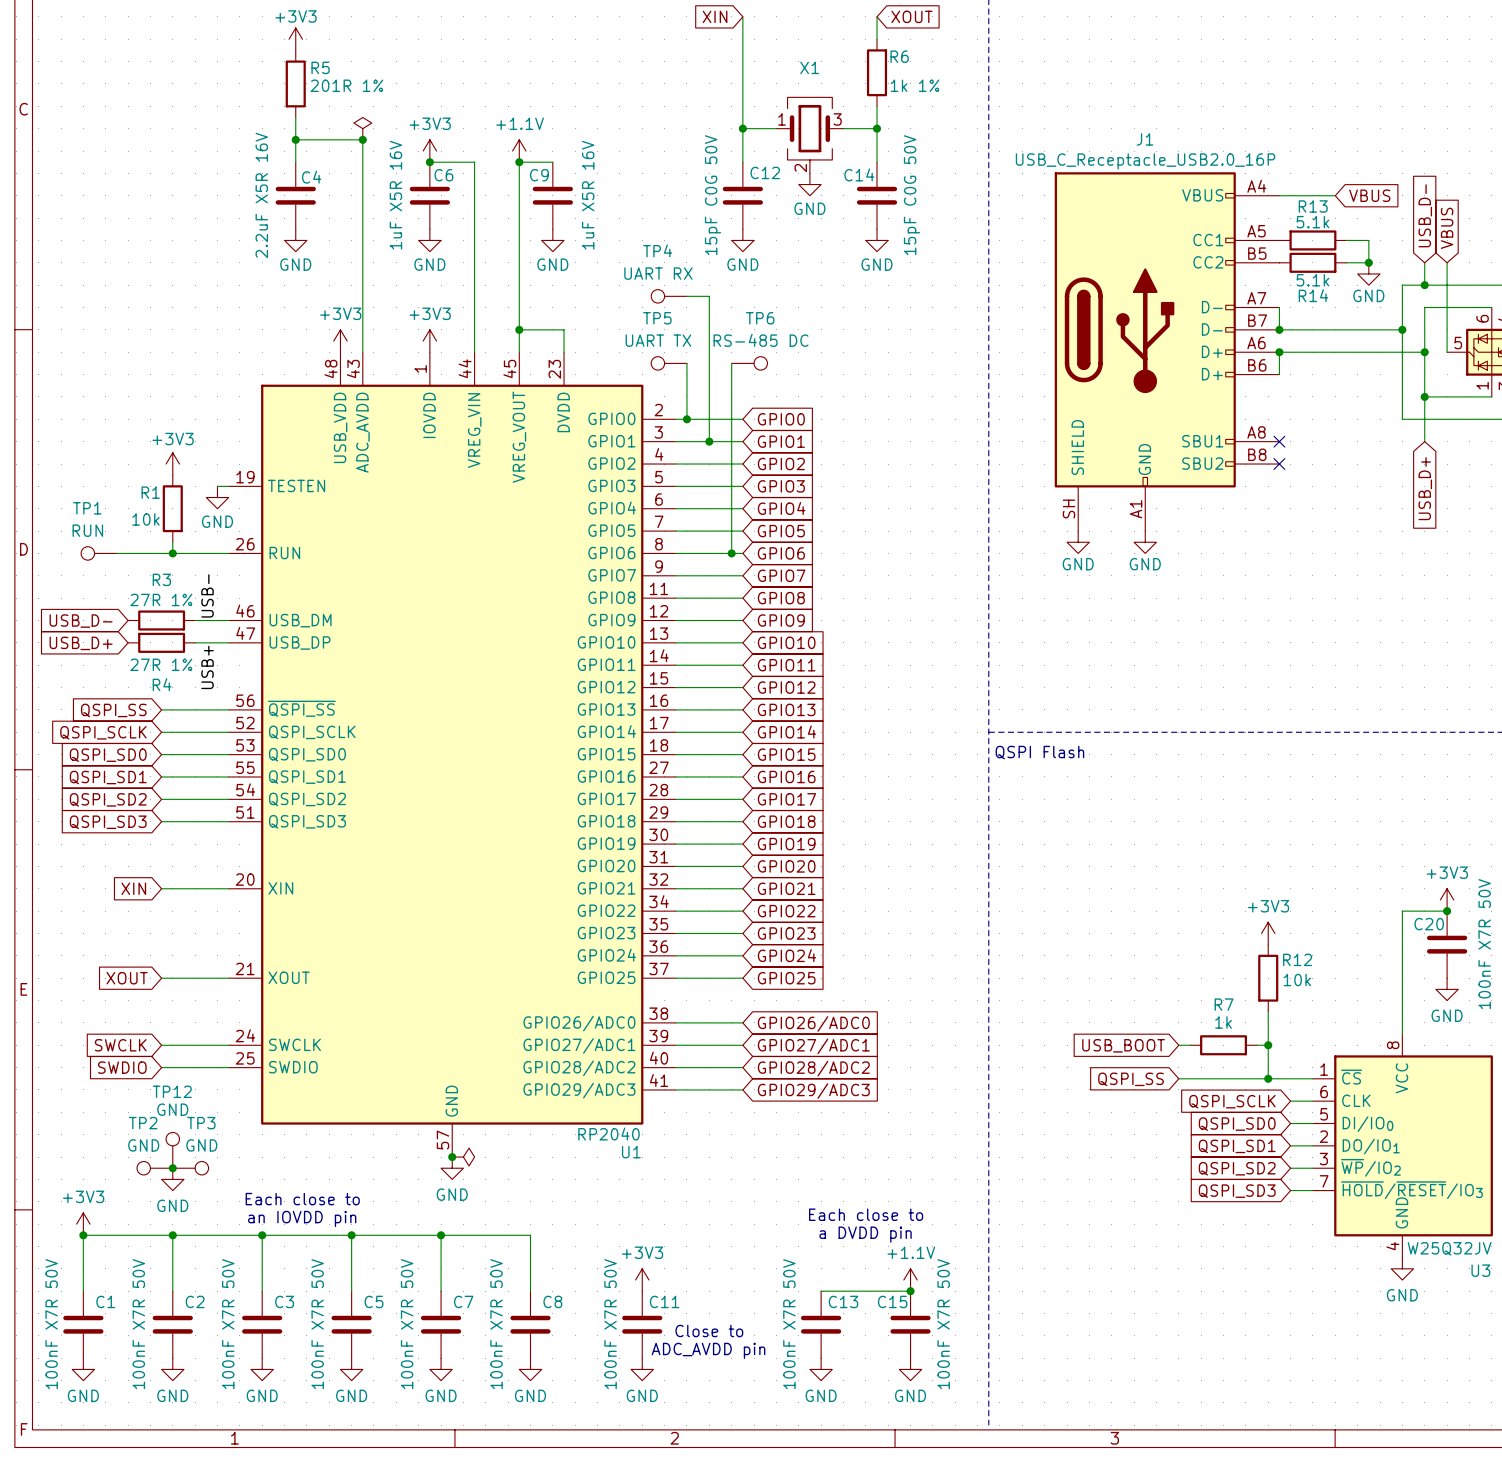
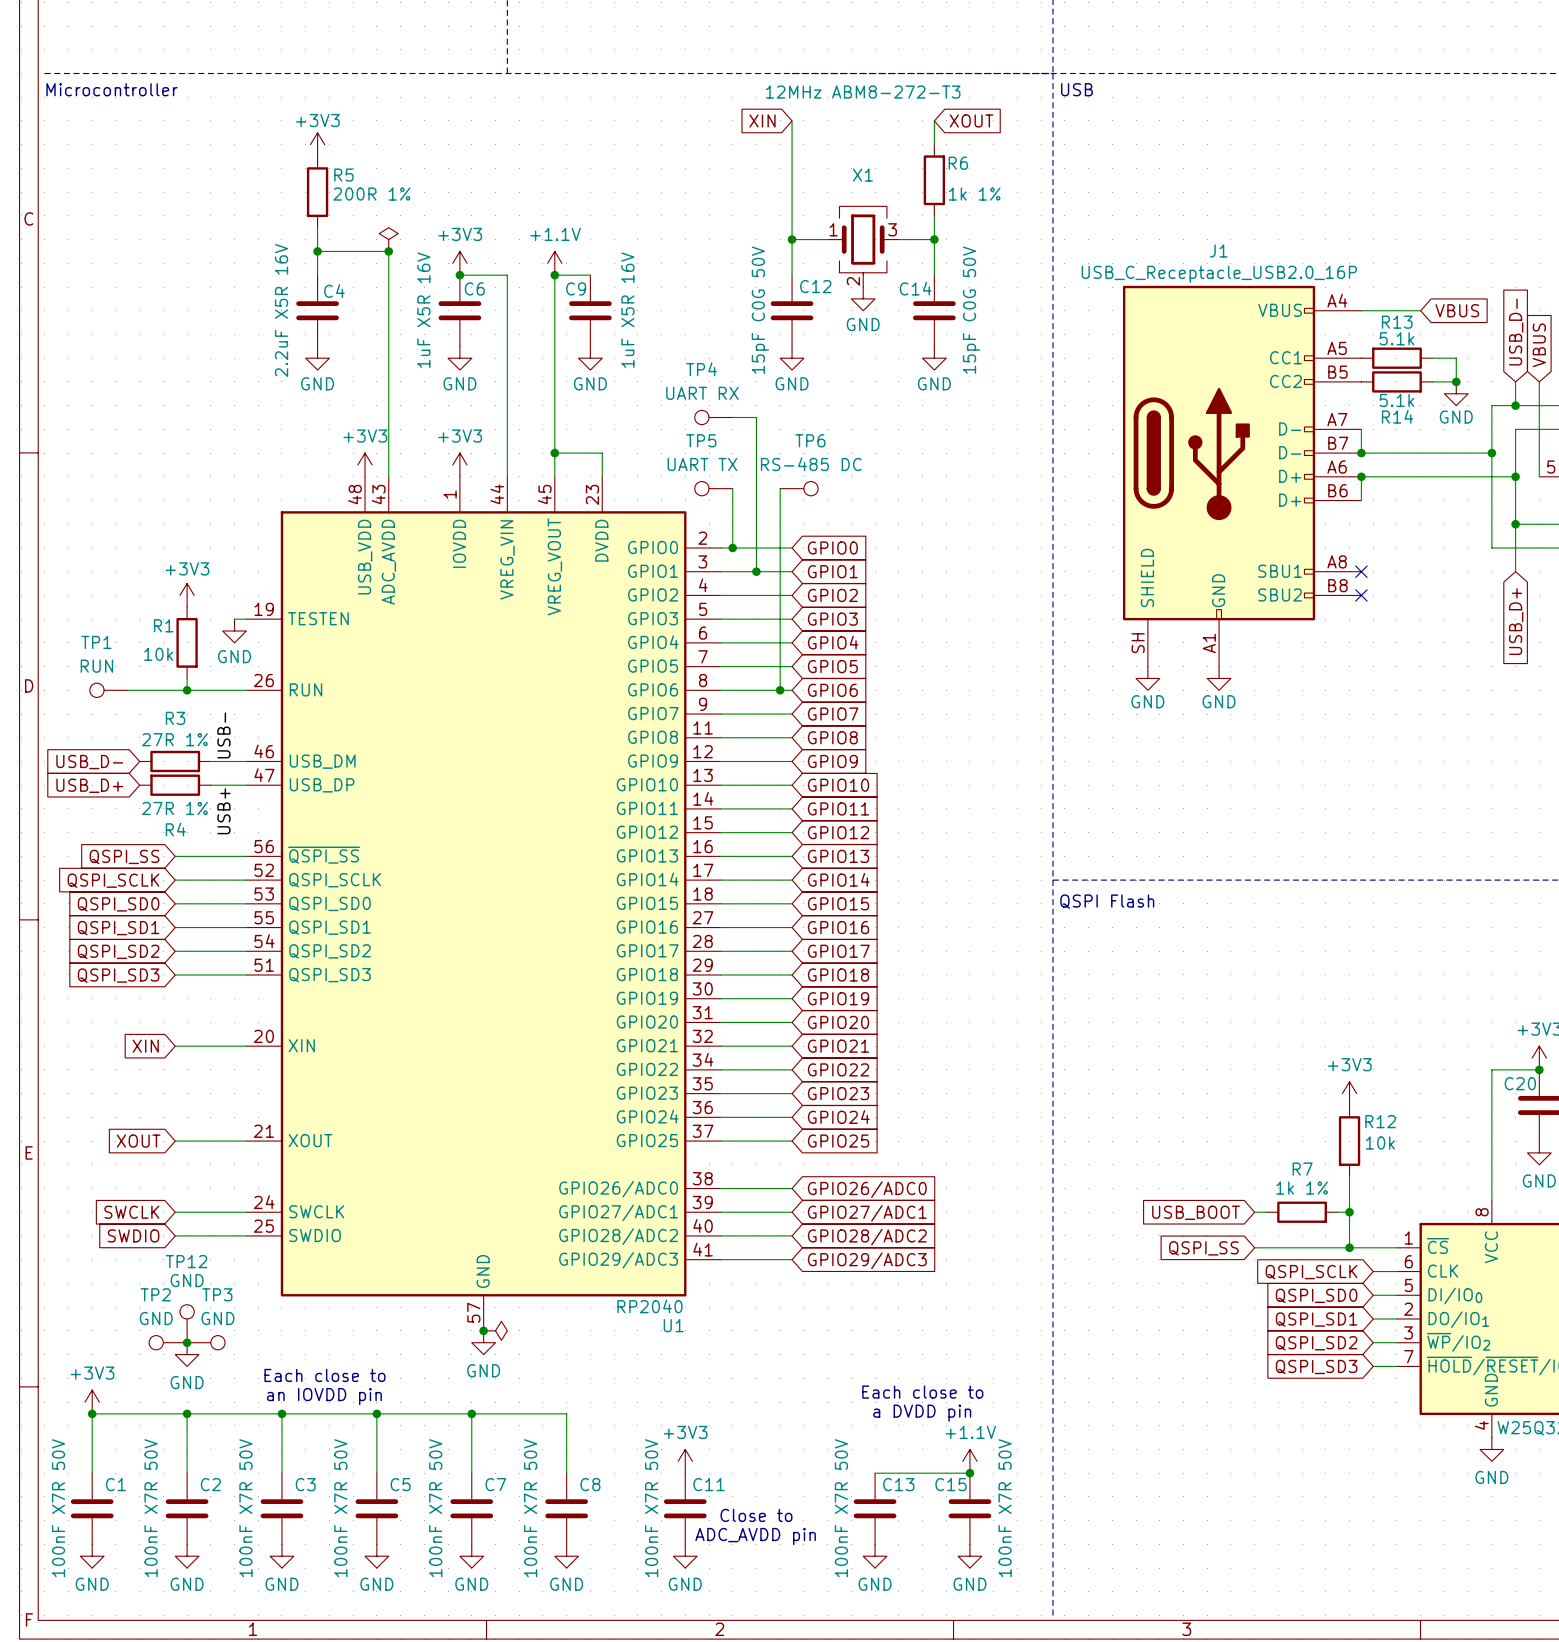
R5 value: 201R 1% (346, 85) -> 200R 1% (371, 194)
R7 value: 1k (1223, 1022) -> 1k 1% (1302, 1188)

